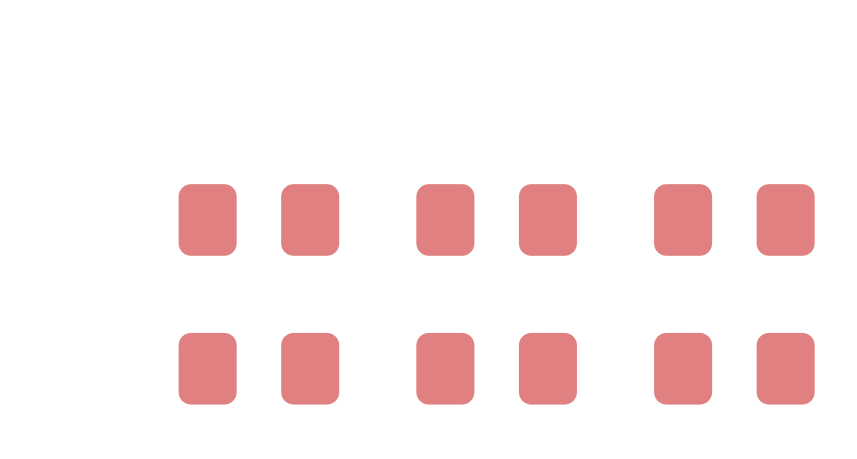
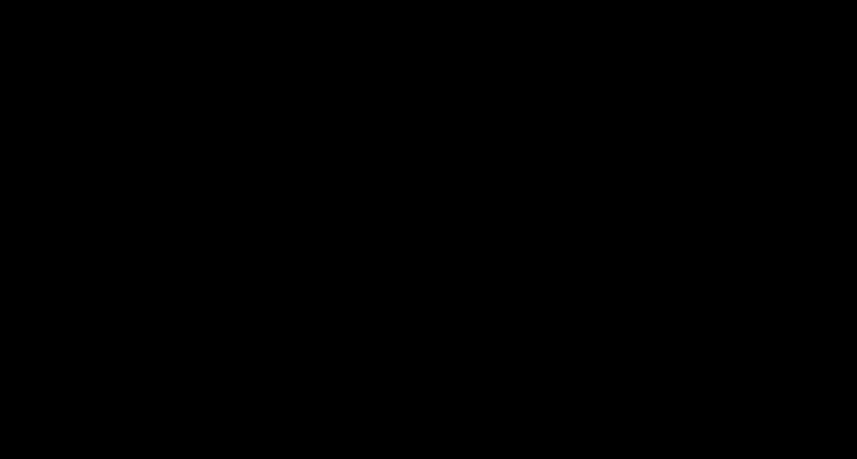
part: (258, 219) -> none
part: (496, 219) -> none
part: (734, 219) -> none
part: (258, 368) -> none
part: (496, 368) -> none
part: (734, 368) -> none

